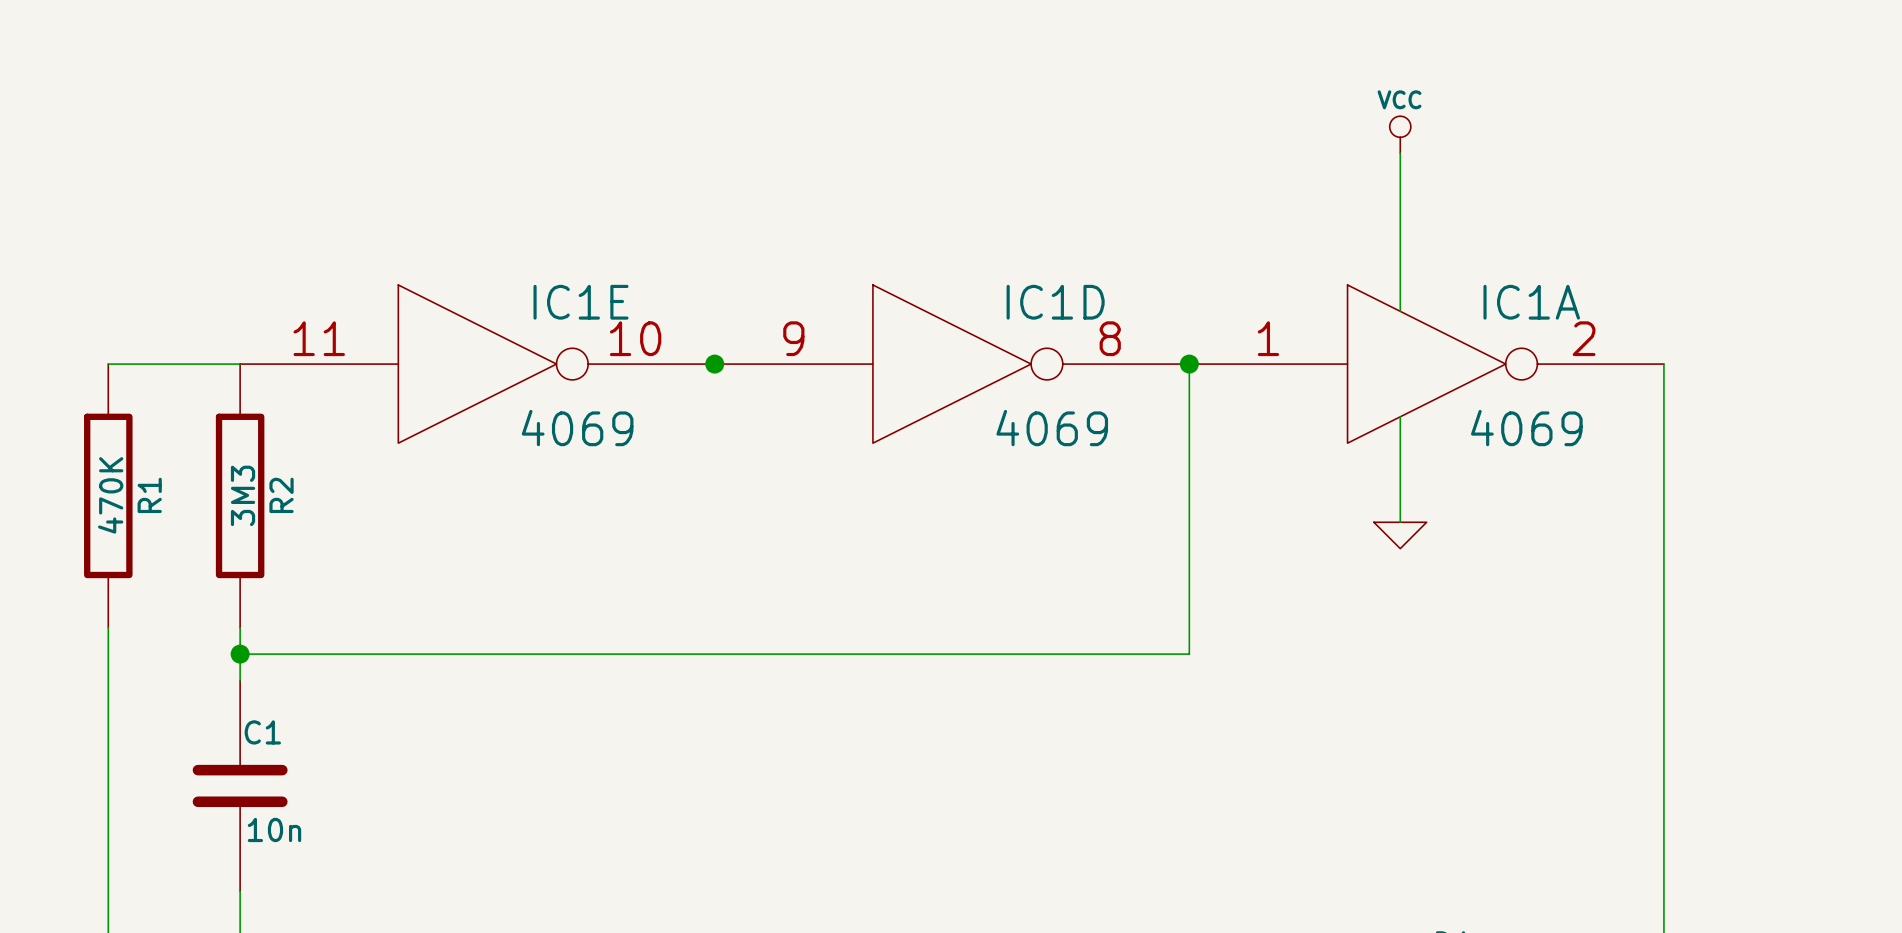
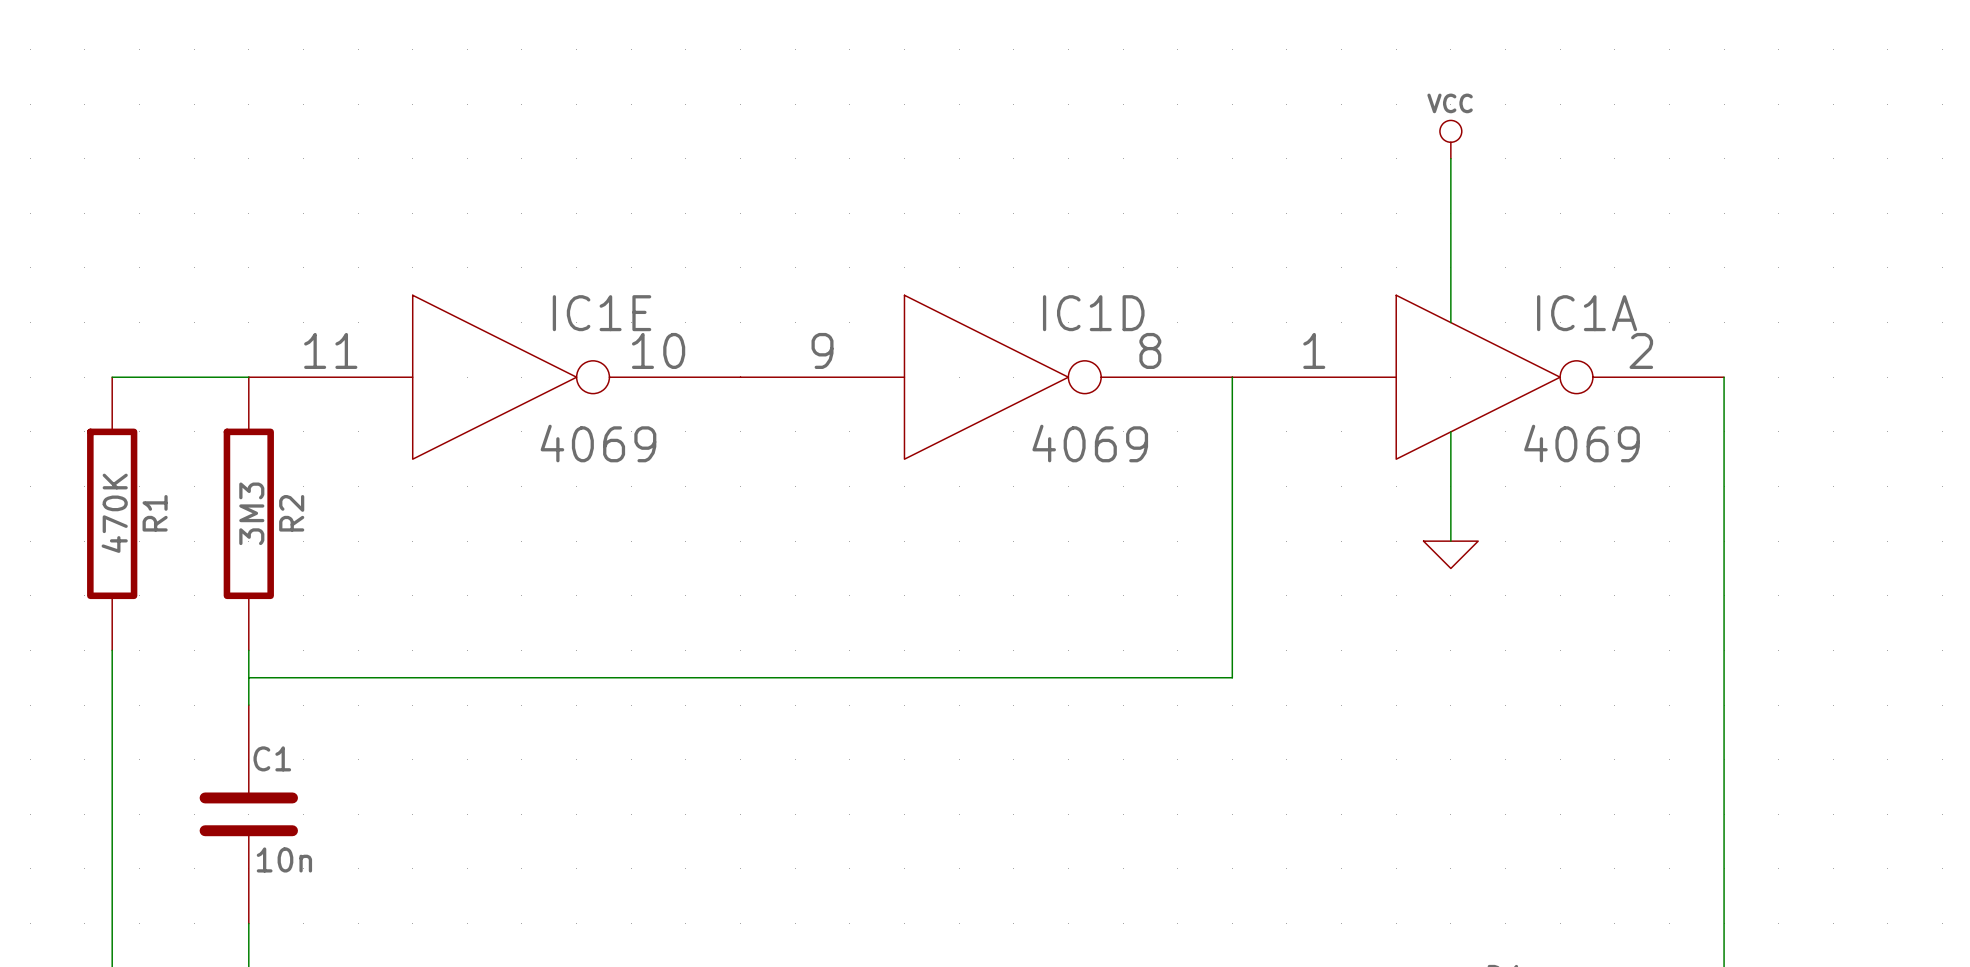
junction: (714, 364) -> none
junction: (1189, 364) -> none
junction: (240, 654) -> none

